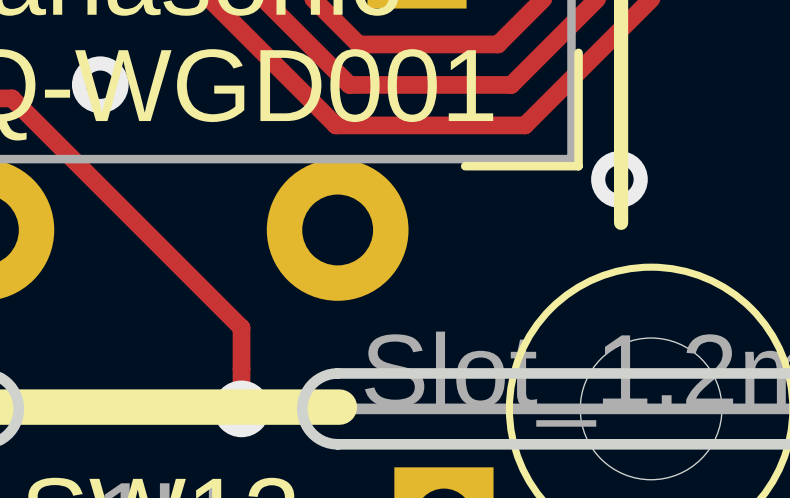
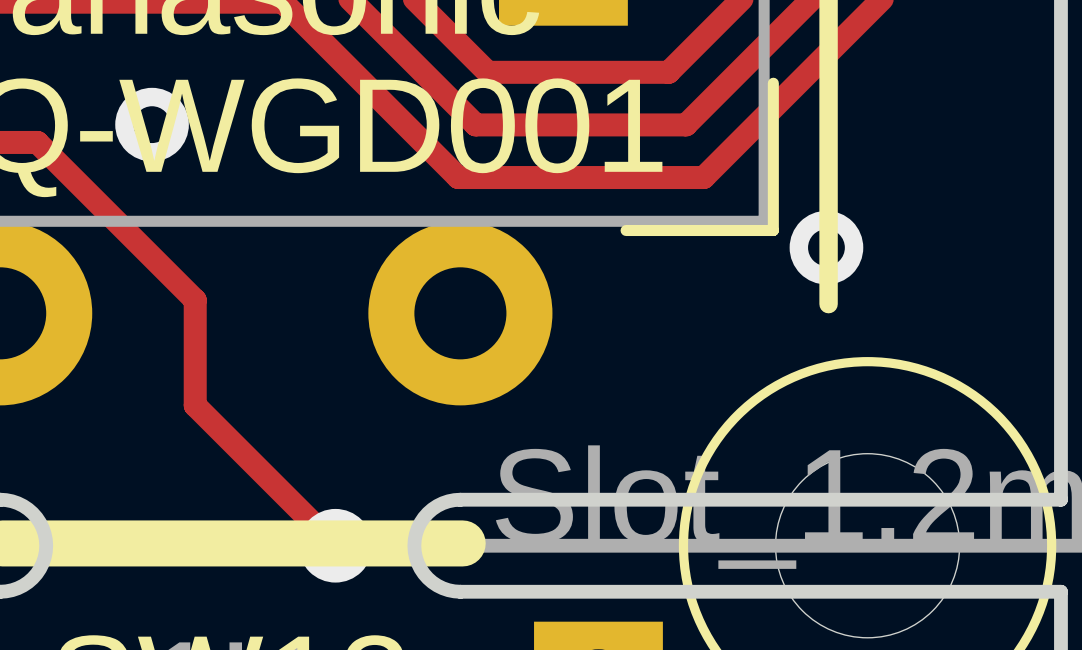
track: (133, 219) (241, 327) (241, 408) -> (195, 300) (195, 405) (335, 545)

